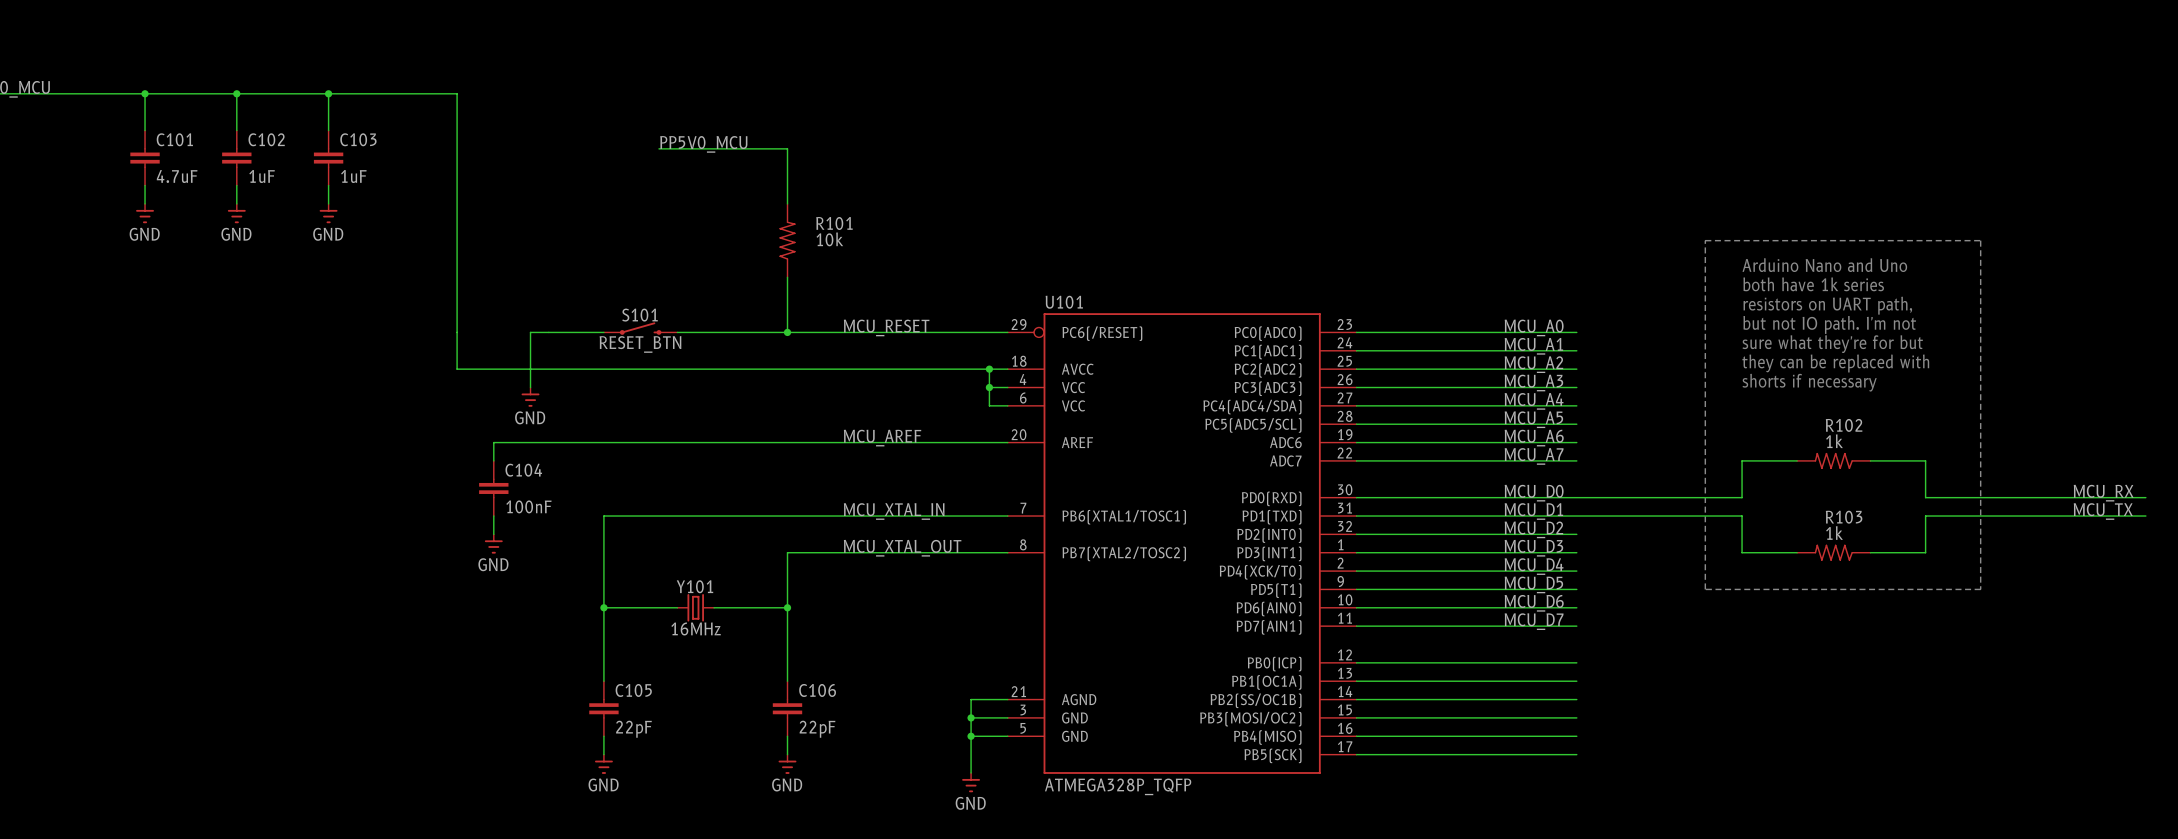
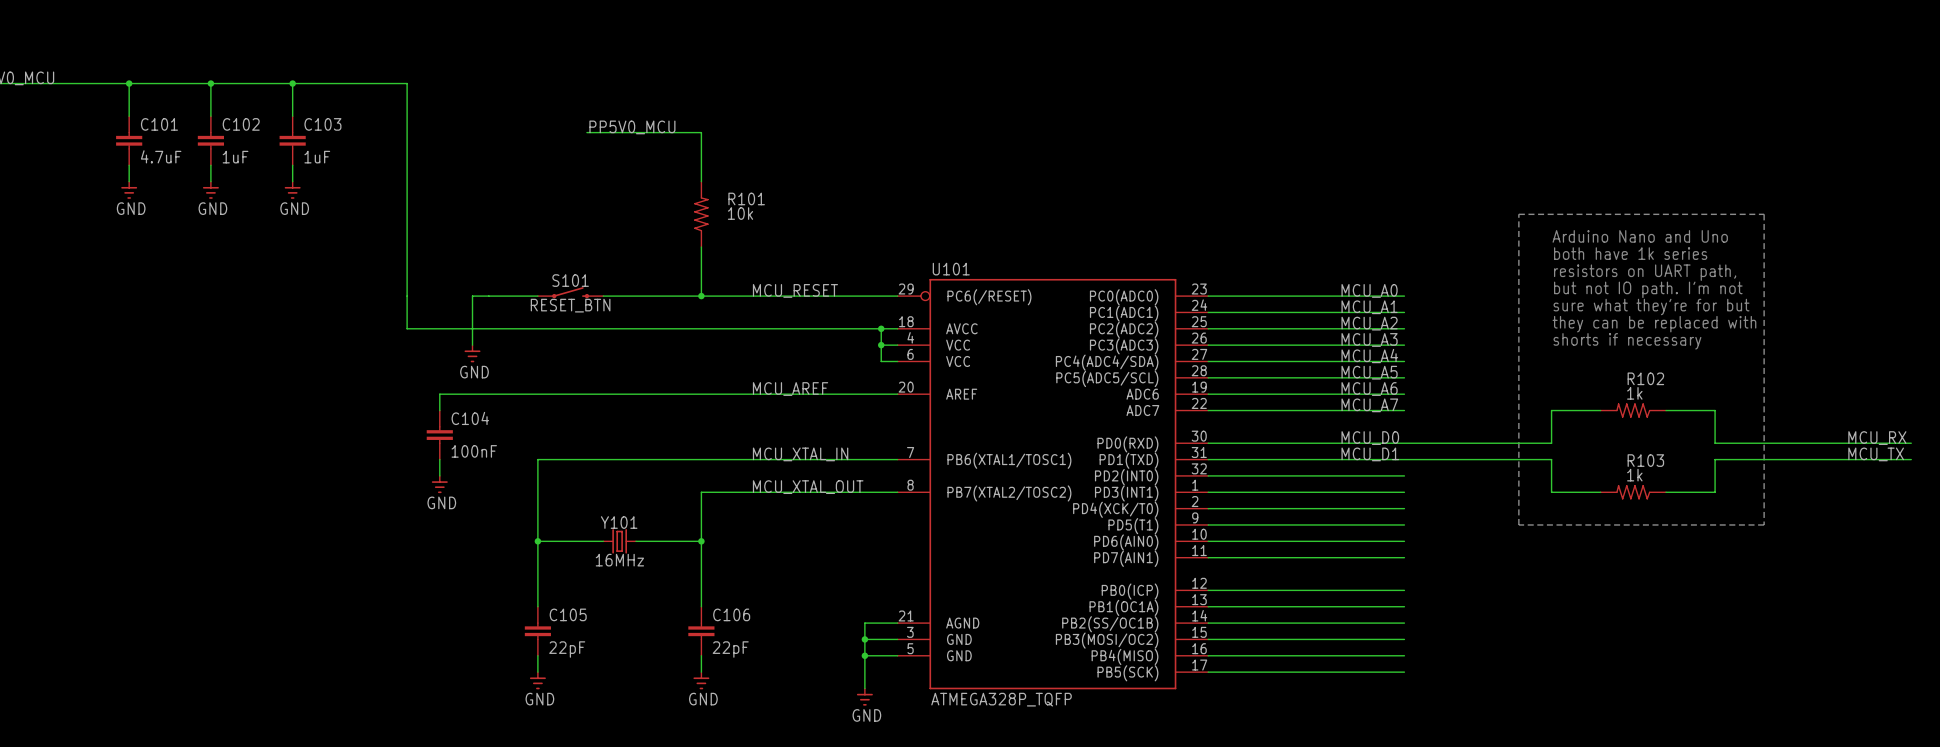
label: MCU_D2 (1533, 529) -> none
label: MCU_D3 (1533, 548) -> none
label: MCU_D4 (1534, 566) -> none
label: MCU_D5 (1533, 584) -> none
label: MCU_D6 (1534, 603) -> none
label: MCU_D7 (1534, 621) -> none

